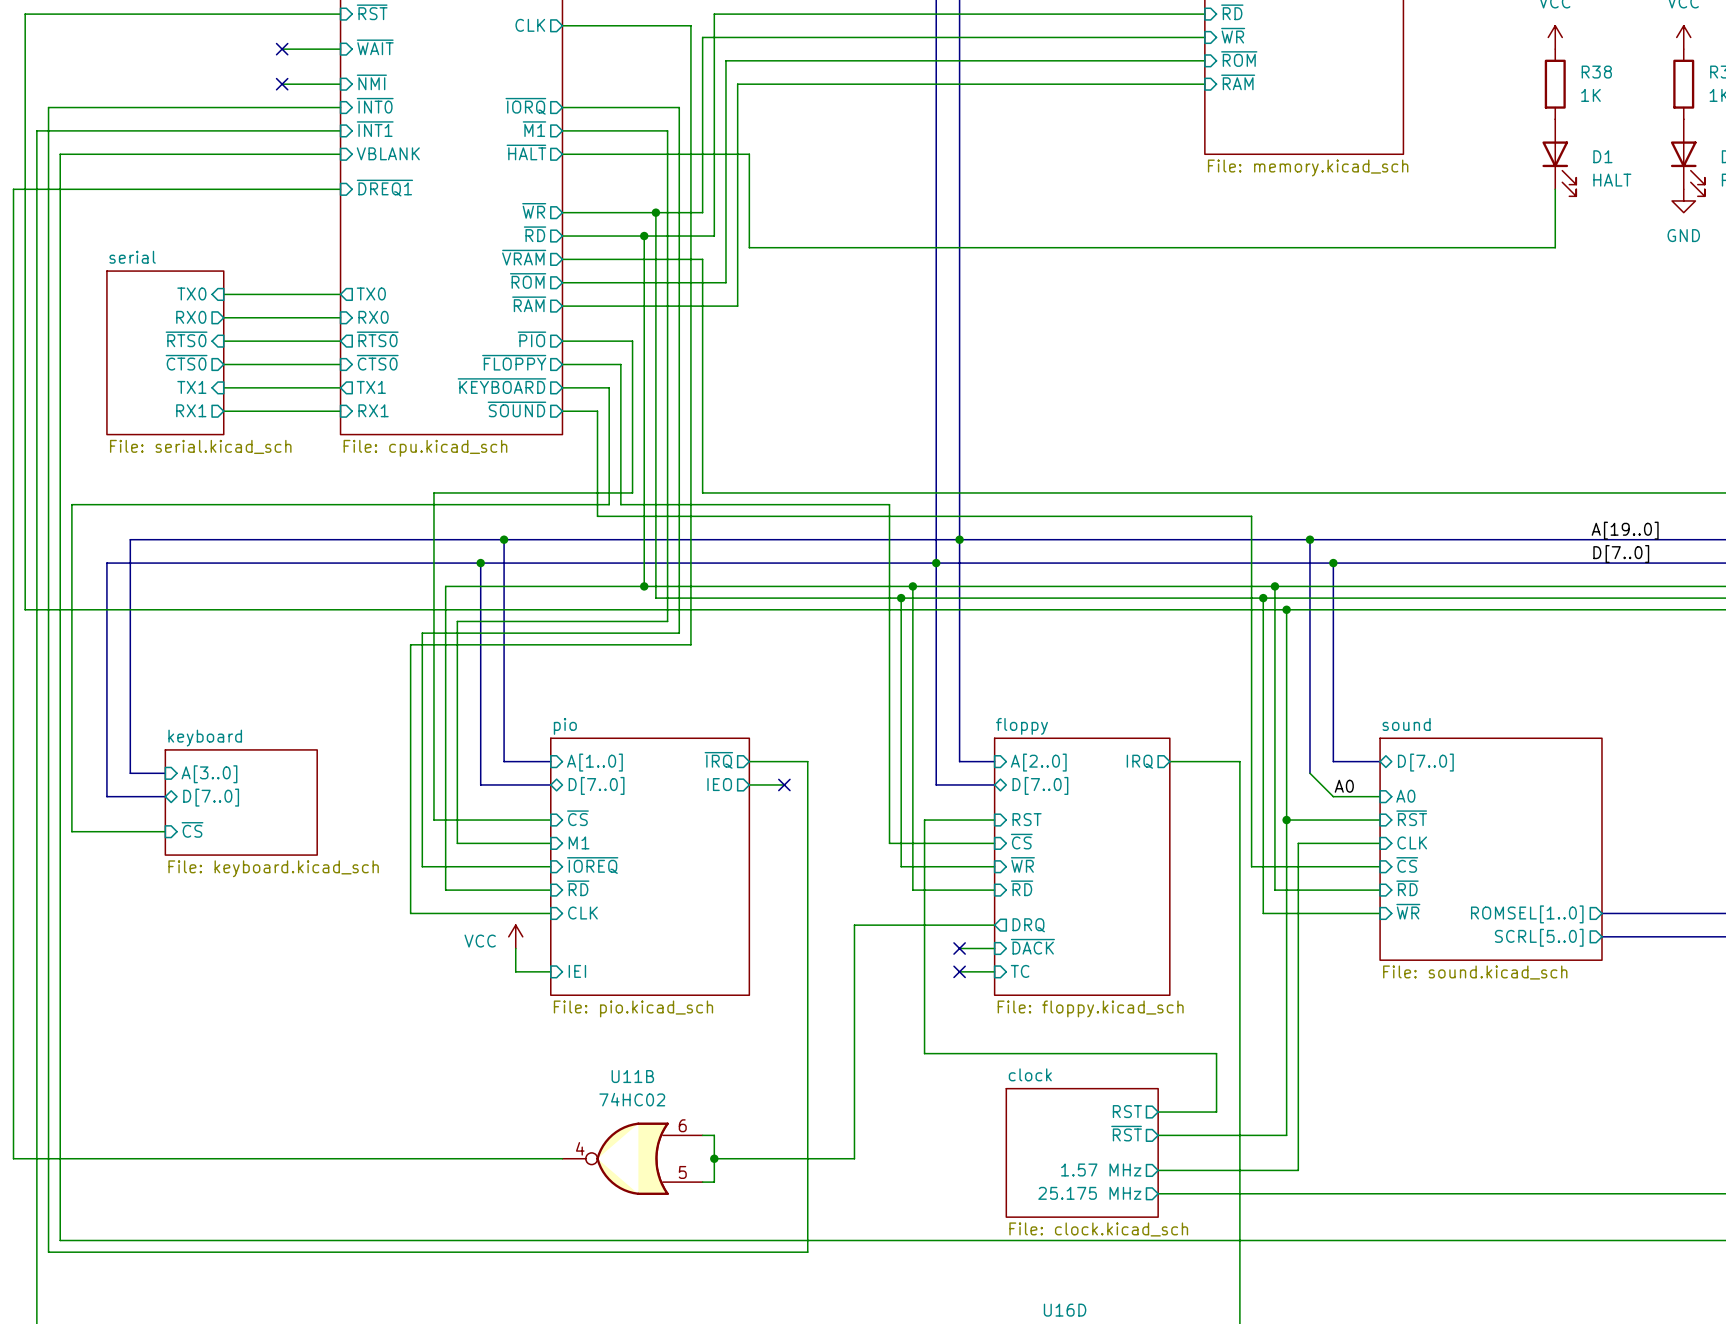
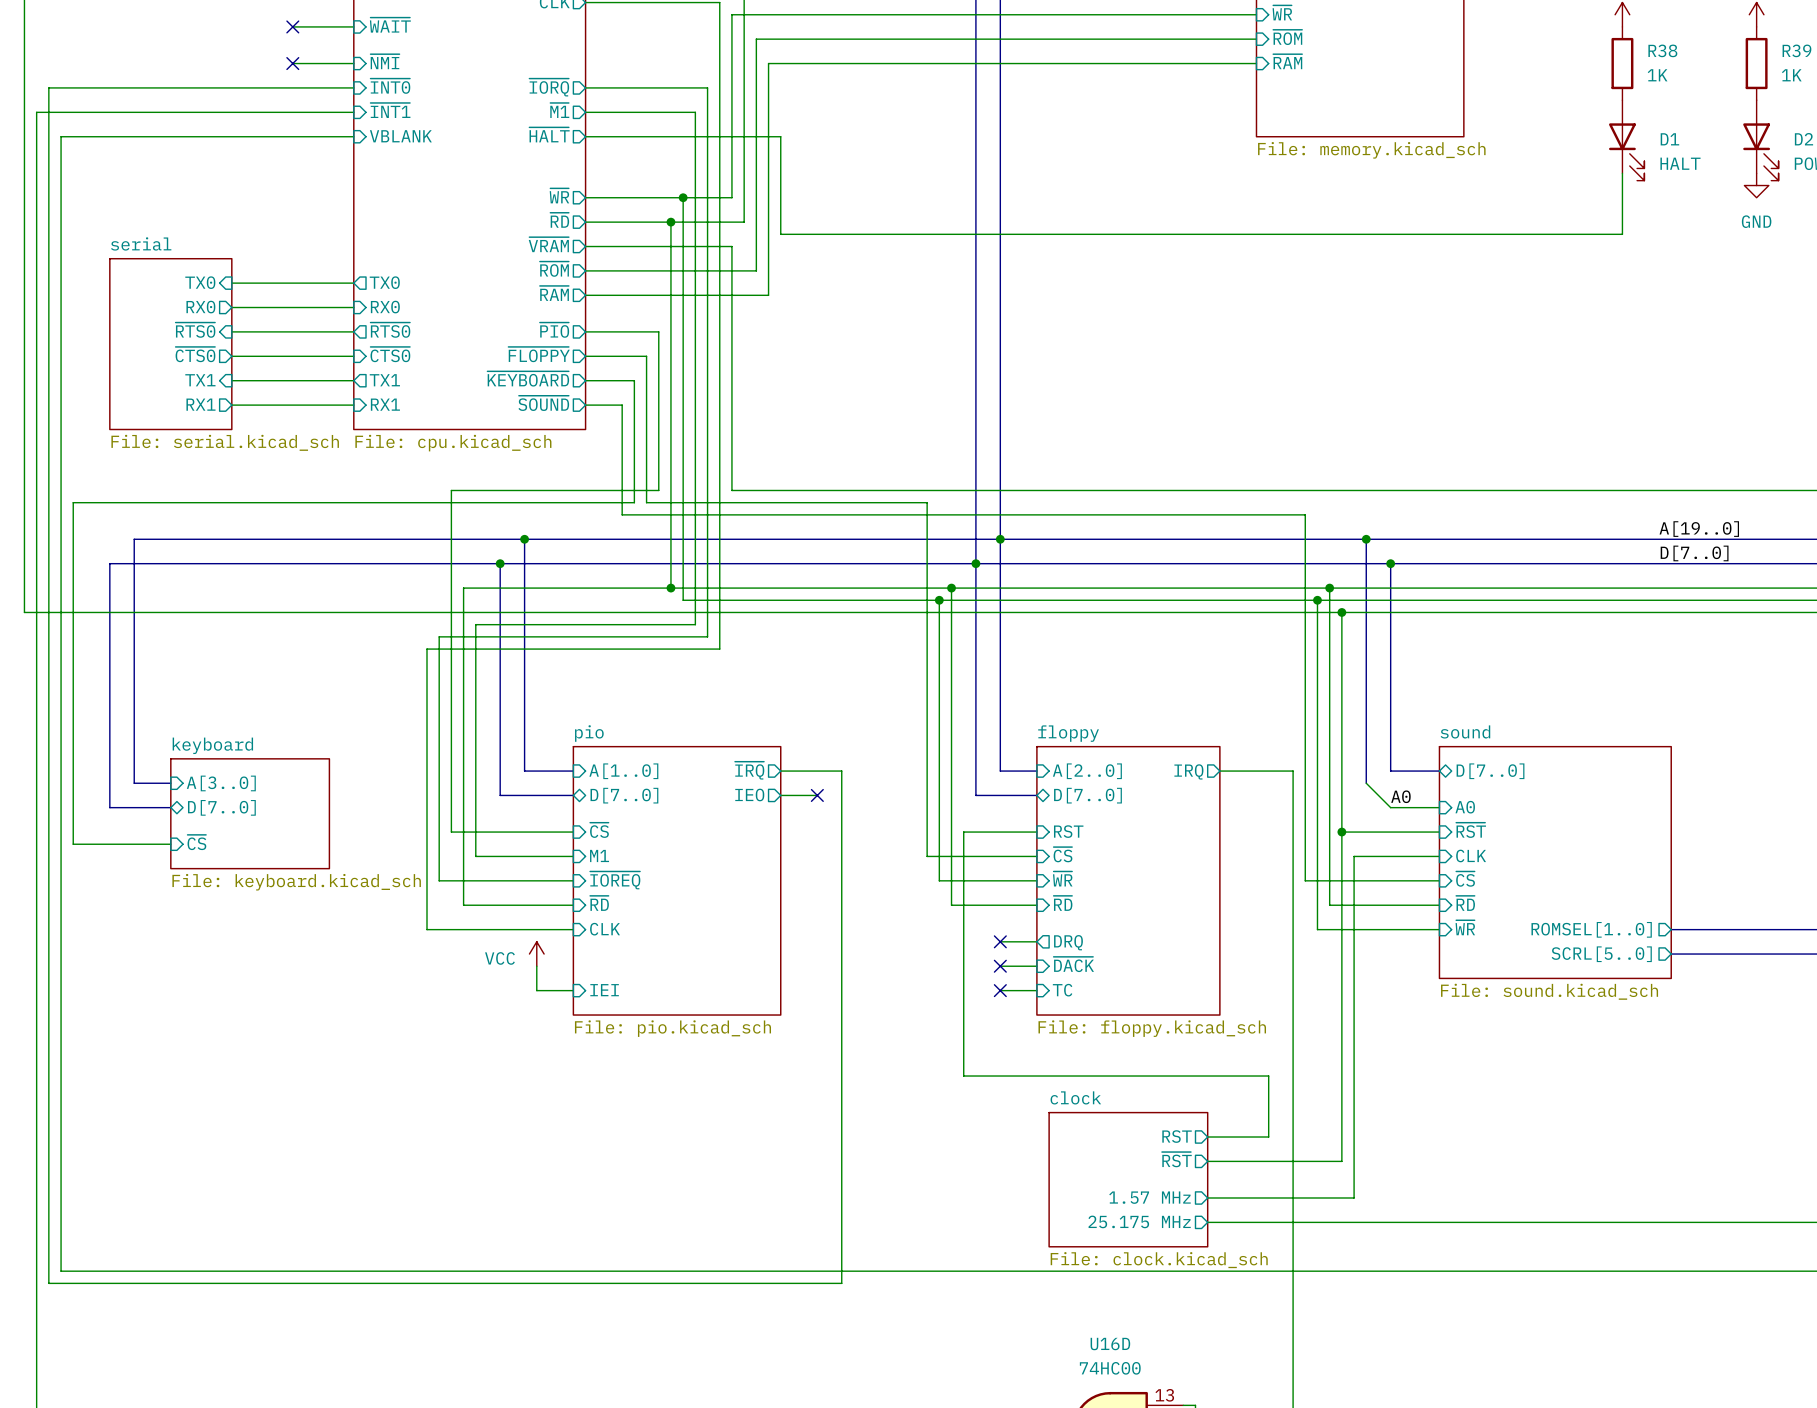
sheet pin: ~{DREQ1} (384, 188) -> none
wire: (340, 189) (13, 189) (13, 1158) (562, 1158) -> none
wire: (959, 925) (854, 925) (854, 1158) (714, 1158) -> none
no-connect mark: none -> (1000, 941)
wire: (702, 1135) (714, 1135) (714, 1182) (702, 1182) -> none
U11B: 74HC02 (632, 1158) -> none
junction: (714, 1158) -> none

